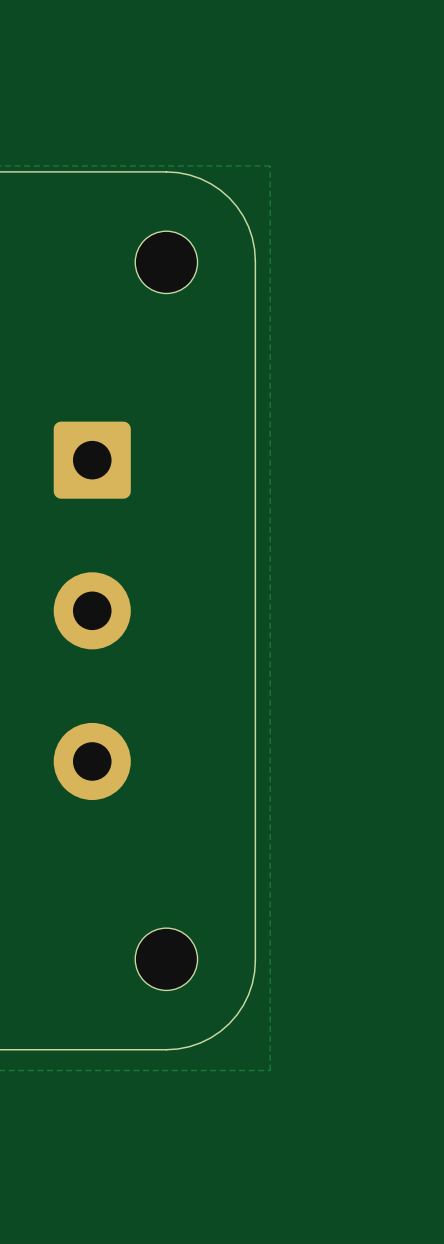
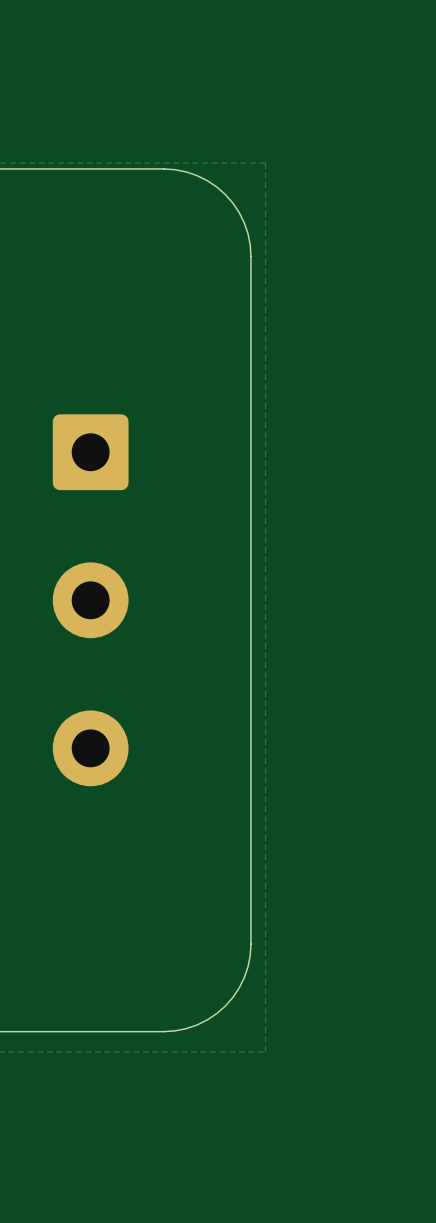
part: (166, 262) -> none
part: (166, 959) -> none

